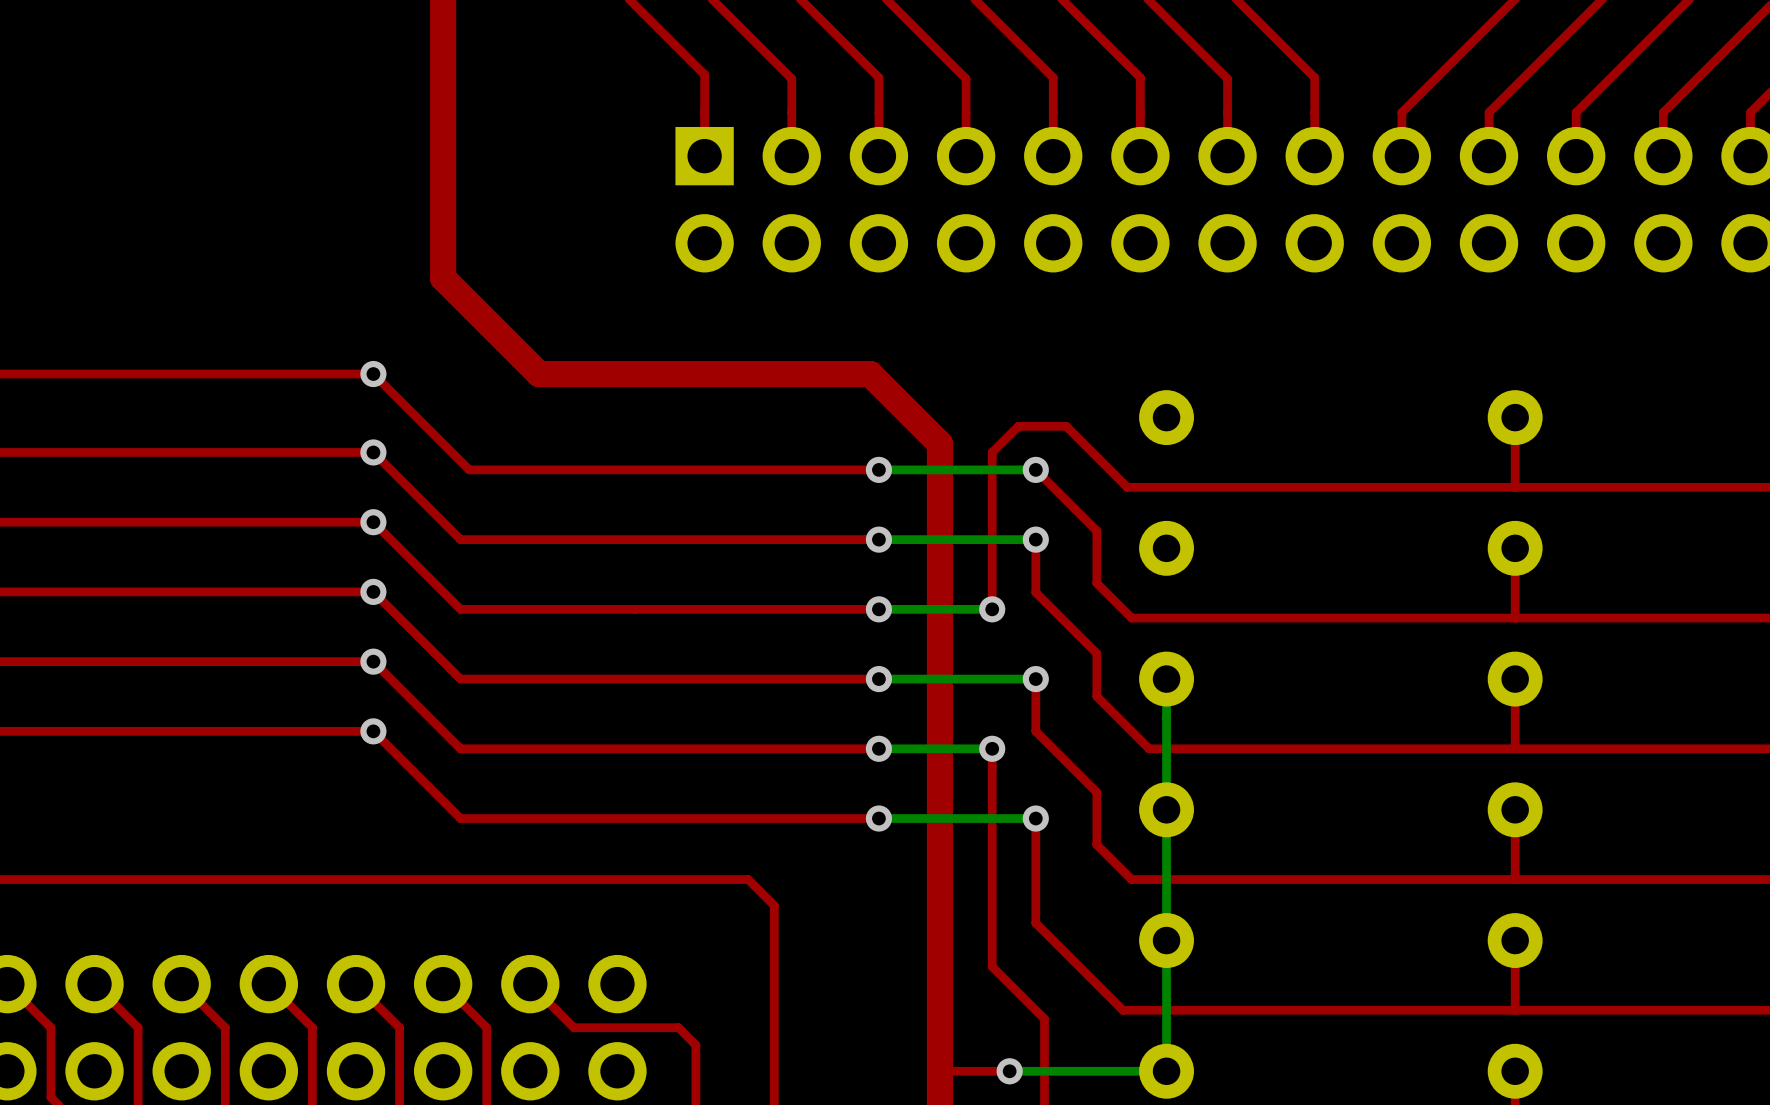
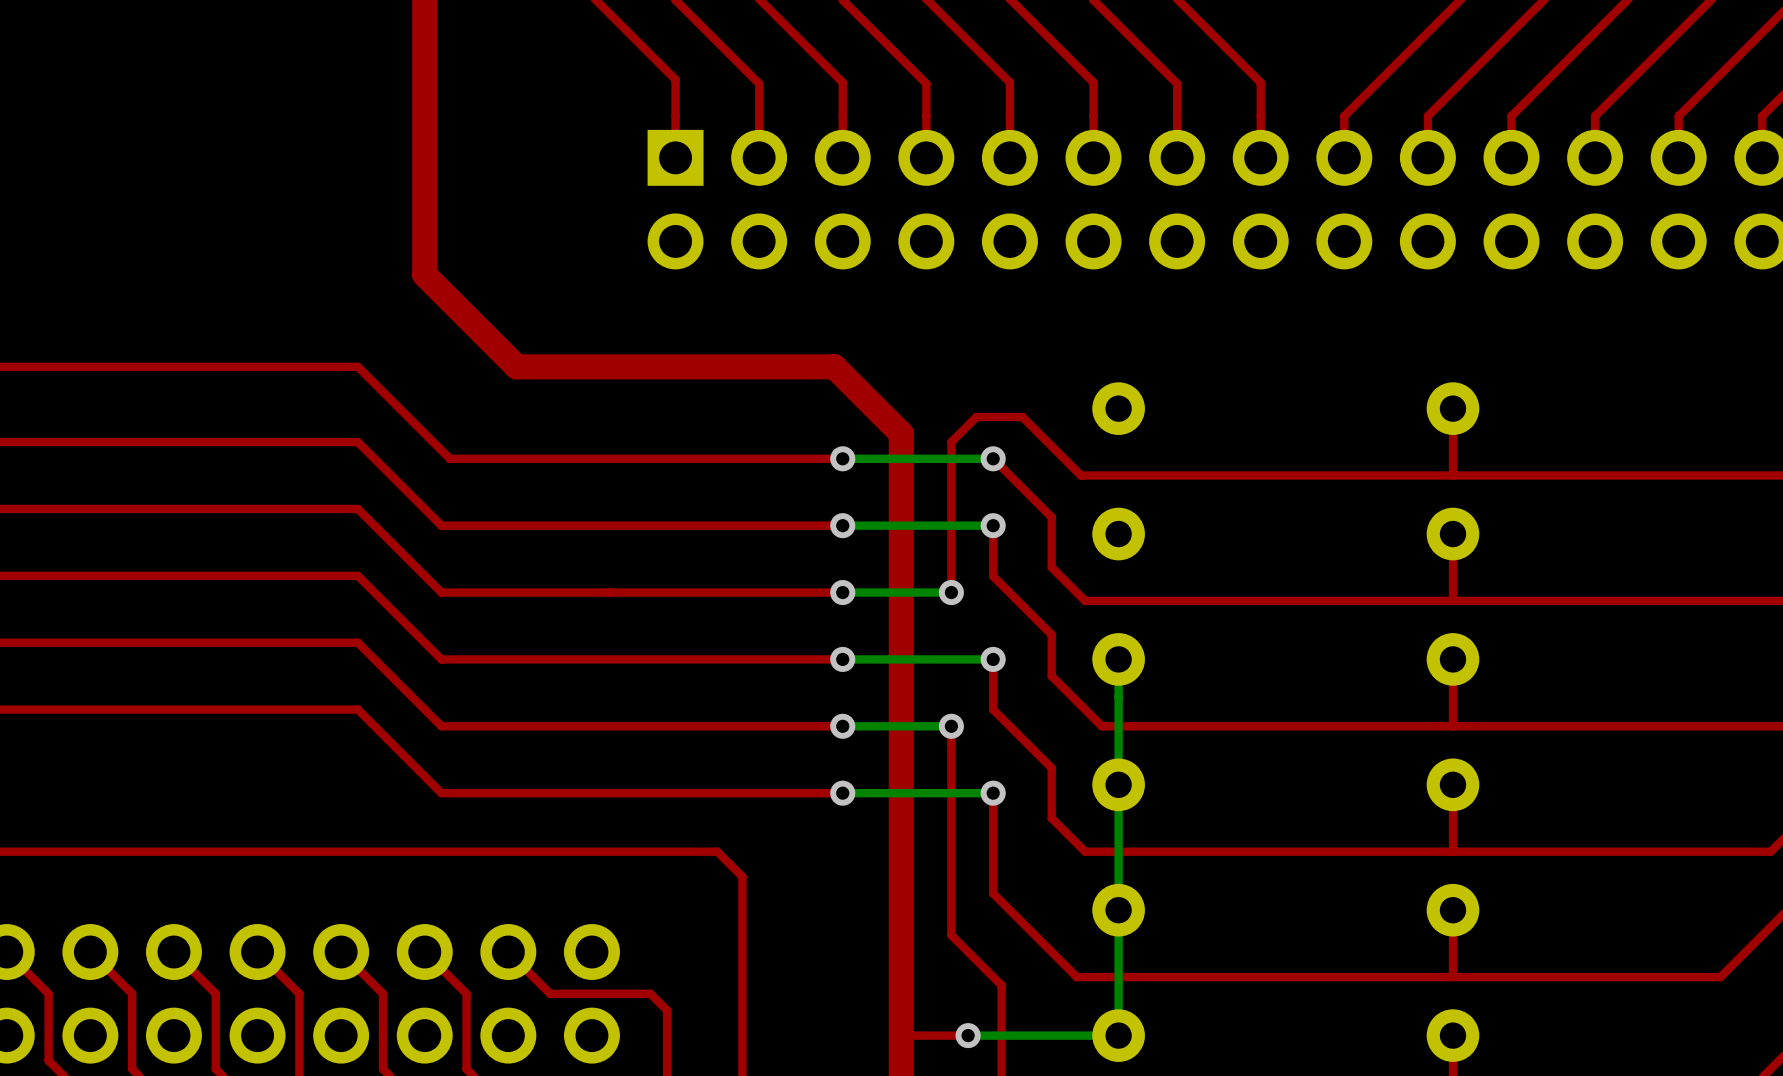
via: (373, 374) -> none
via: (373, 452) -> none
via: (373, 522) -> none
via: (373, 591) -> none
via: (373, 661) -> none
via: (373, 731) -> none

